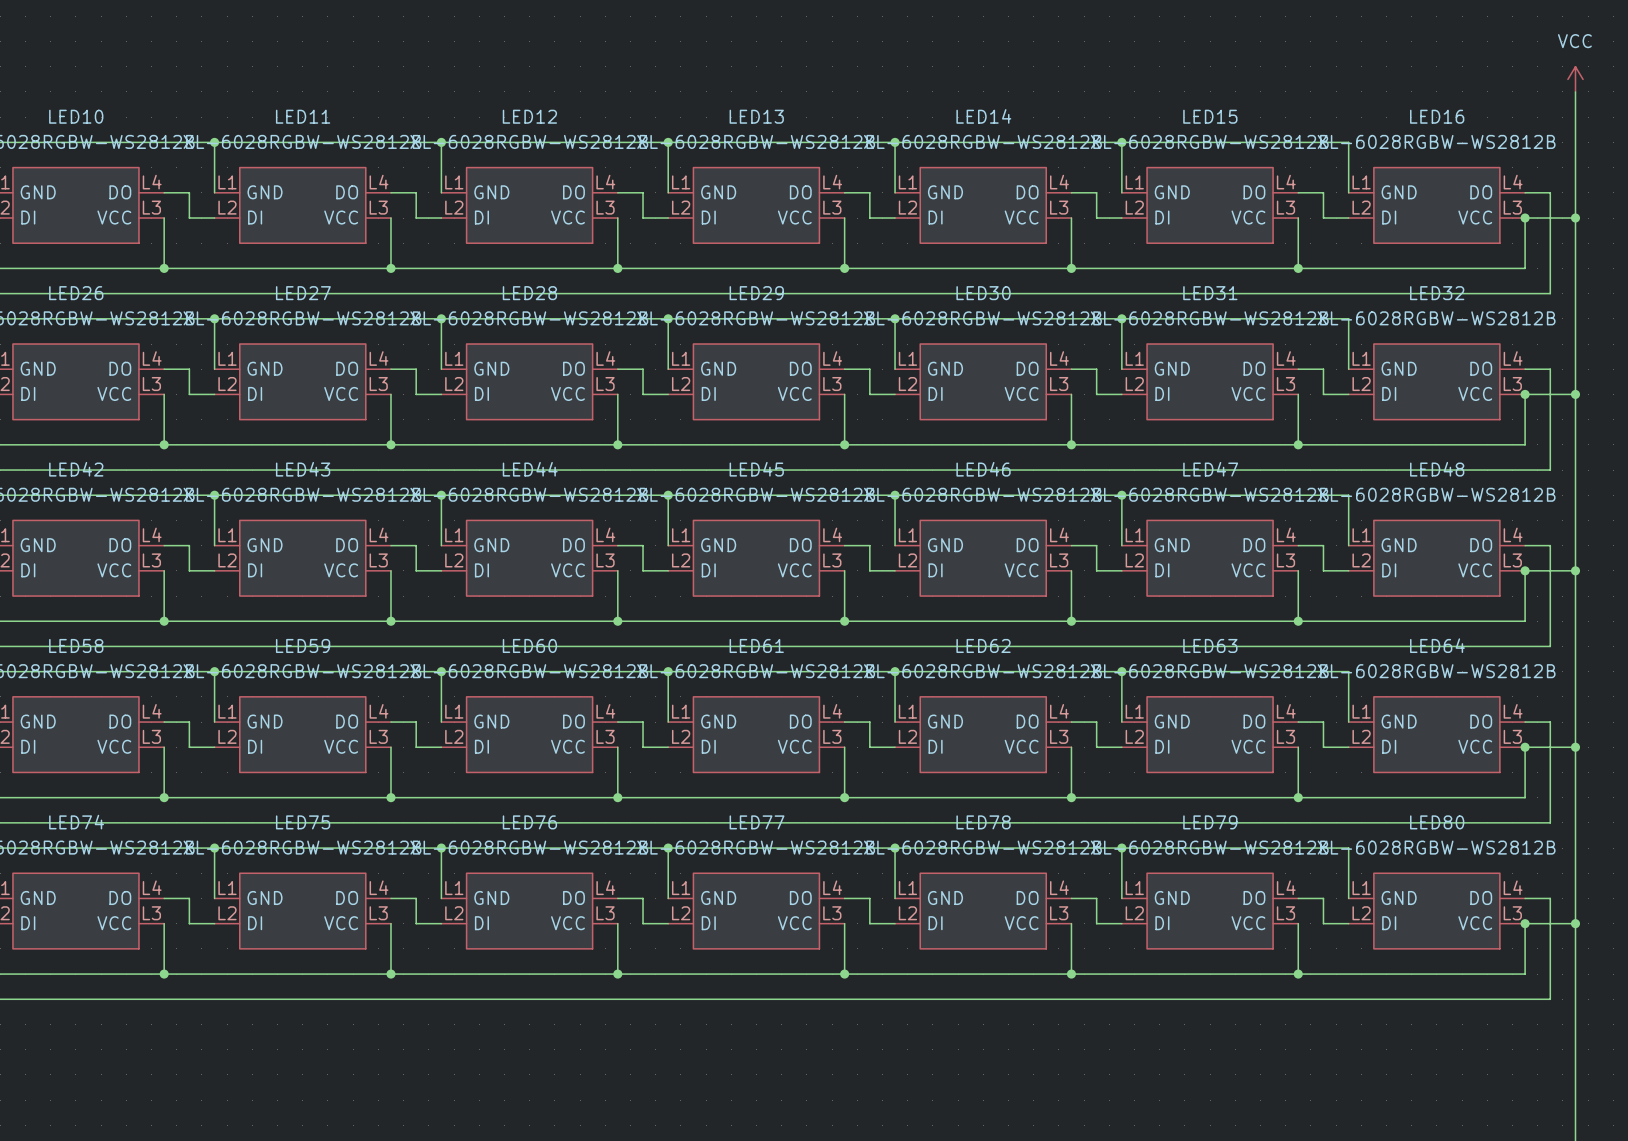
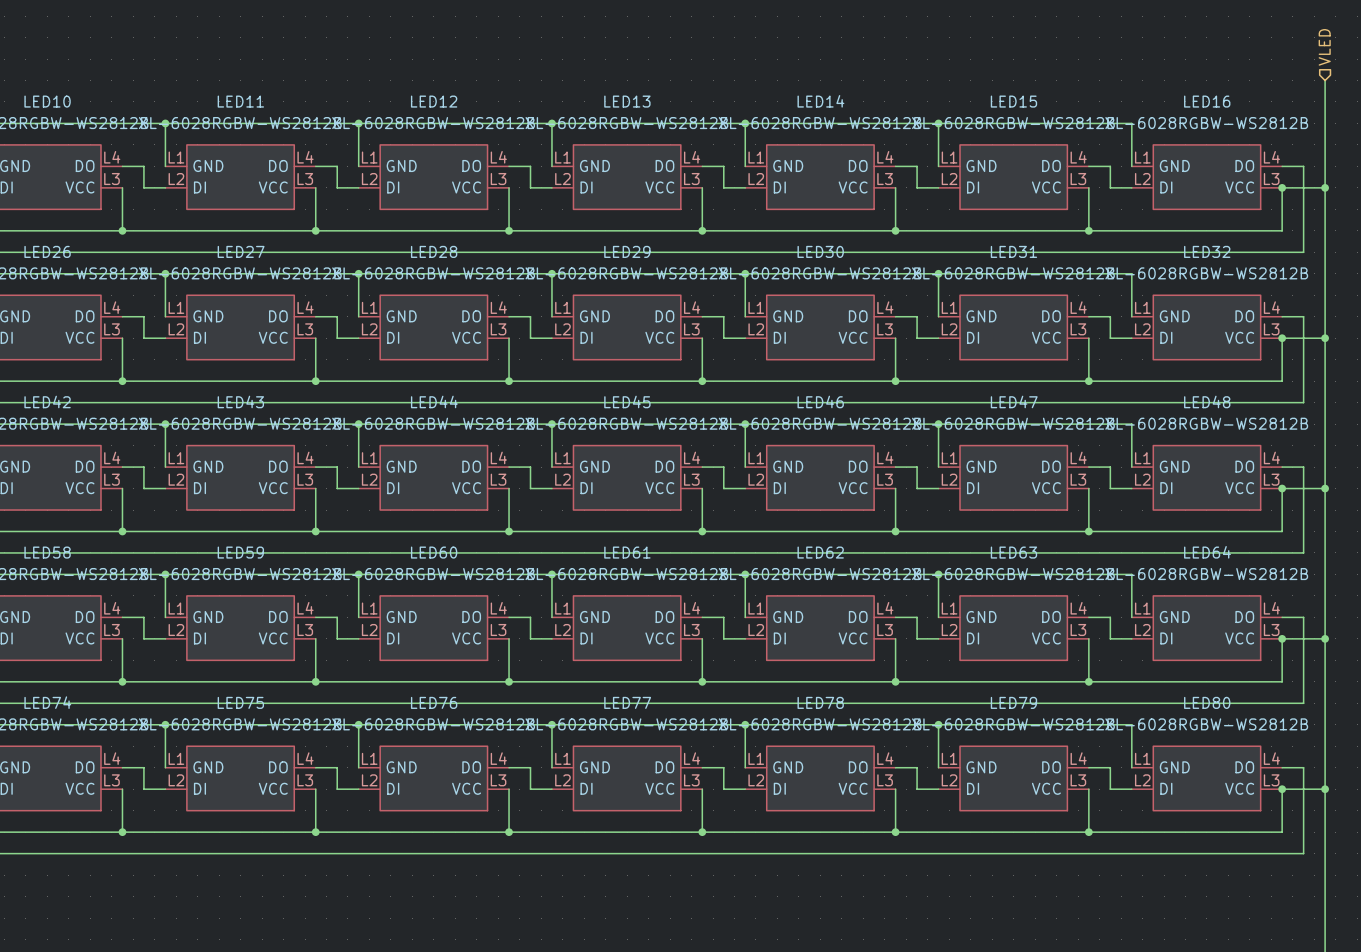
hierarchical label: none -> VLED (1324, 47)
power symbol: VCC (1575, 79) -> none

